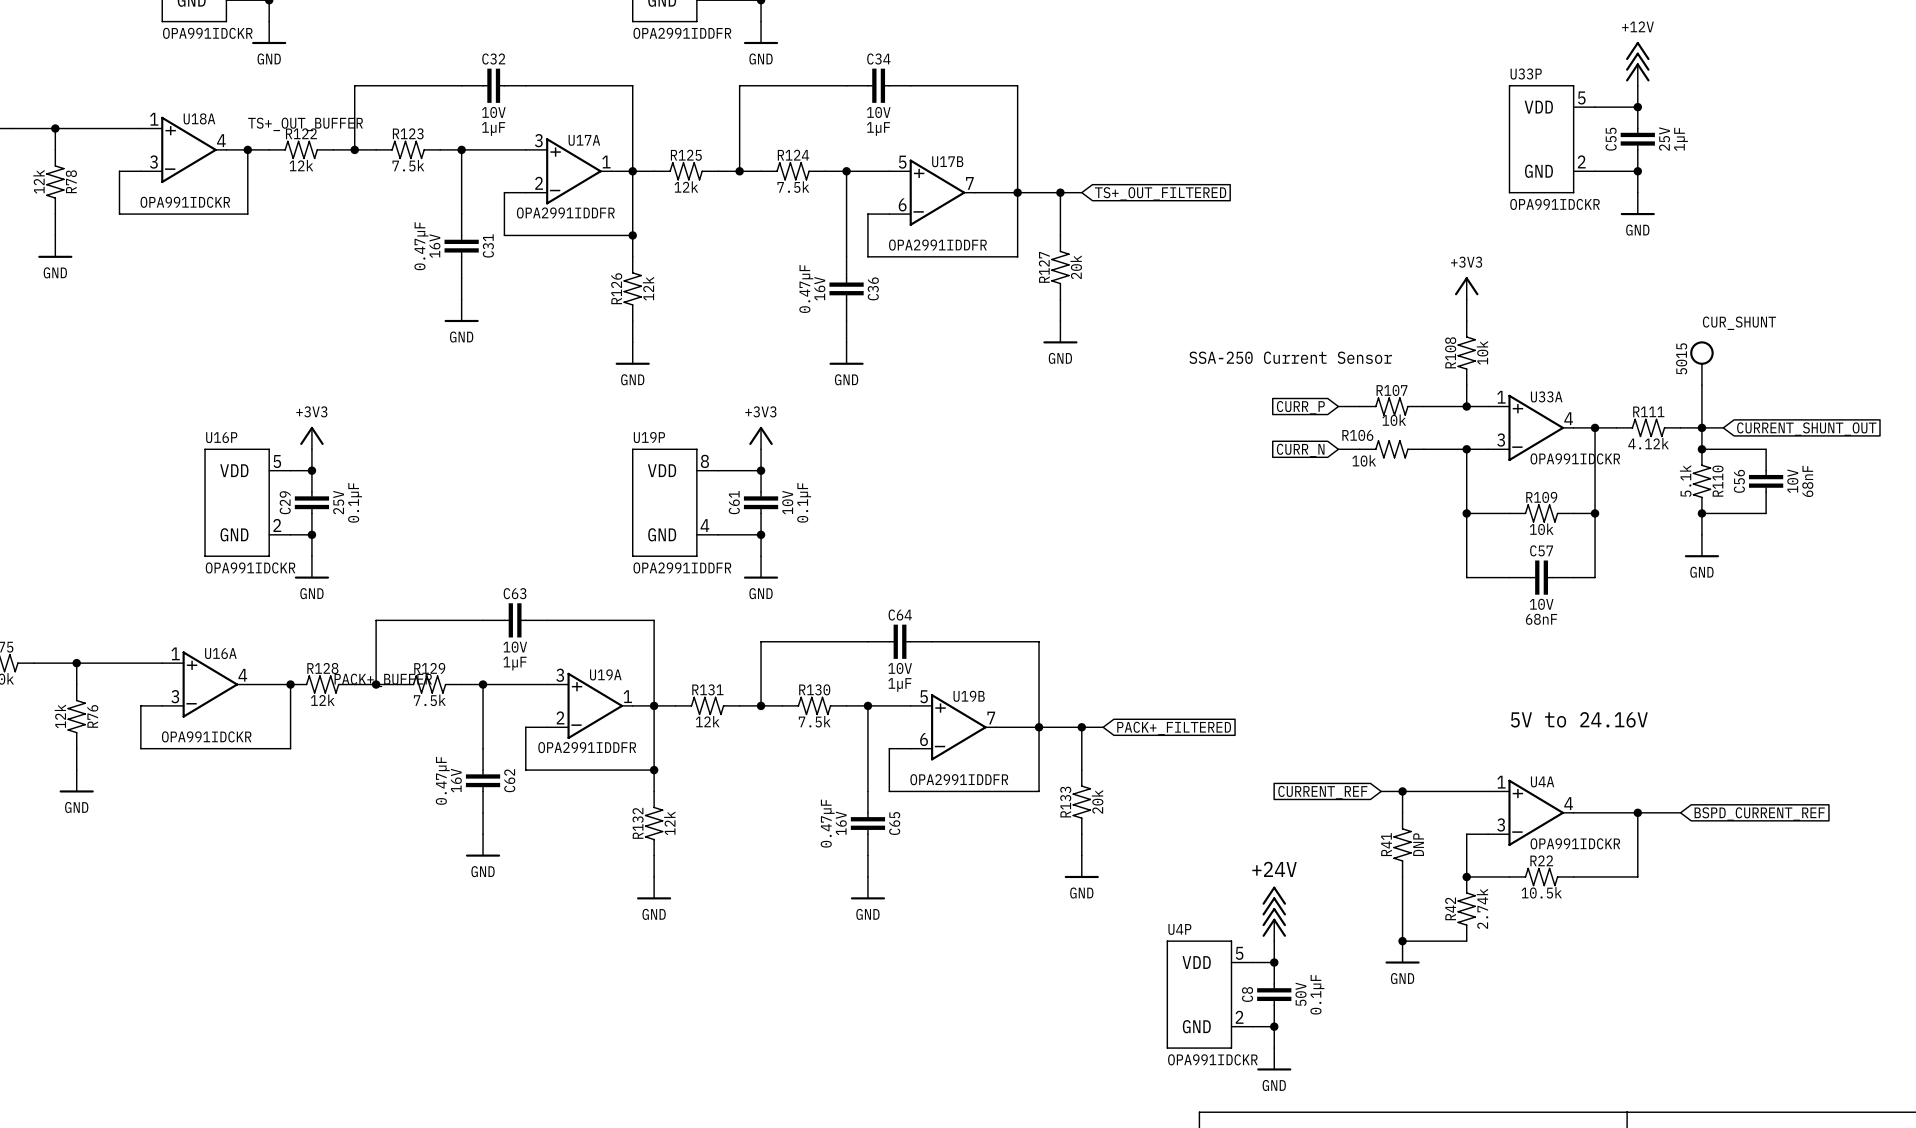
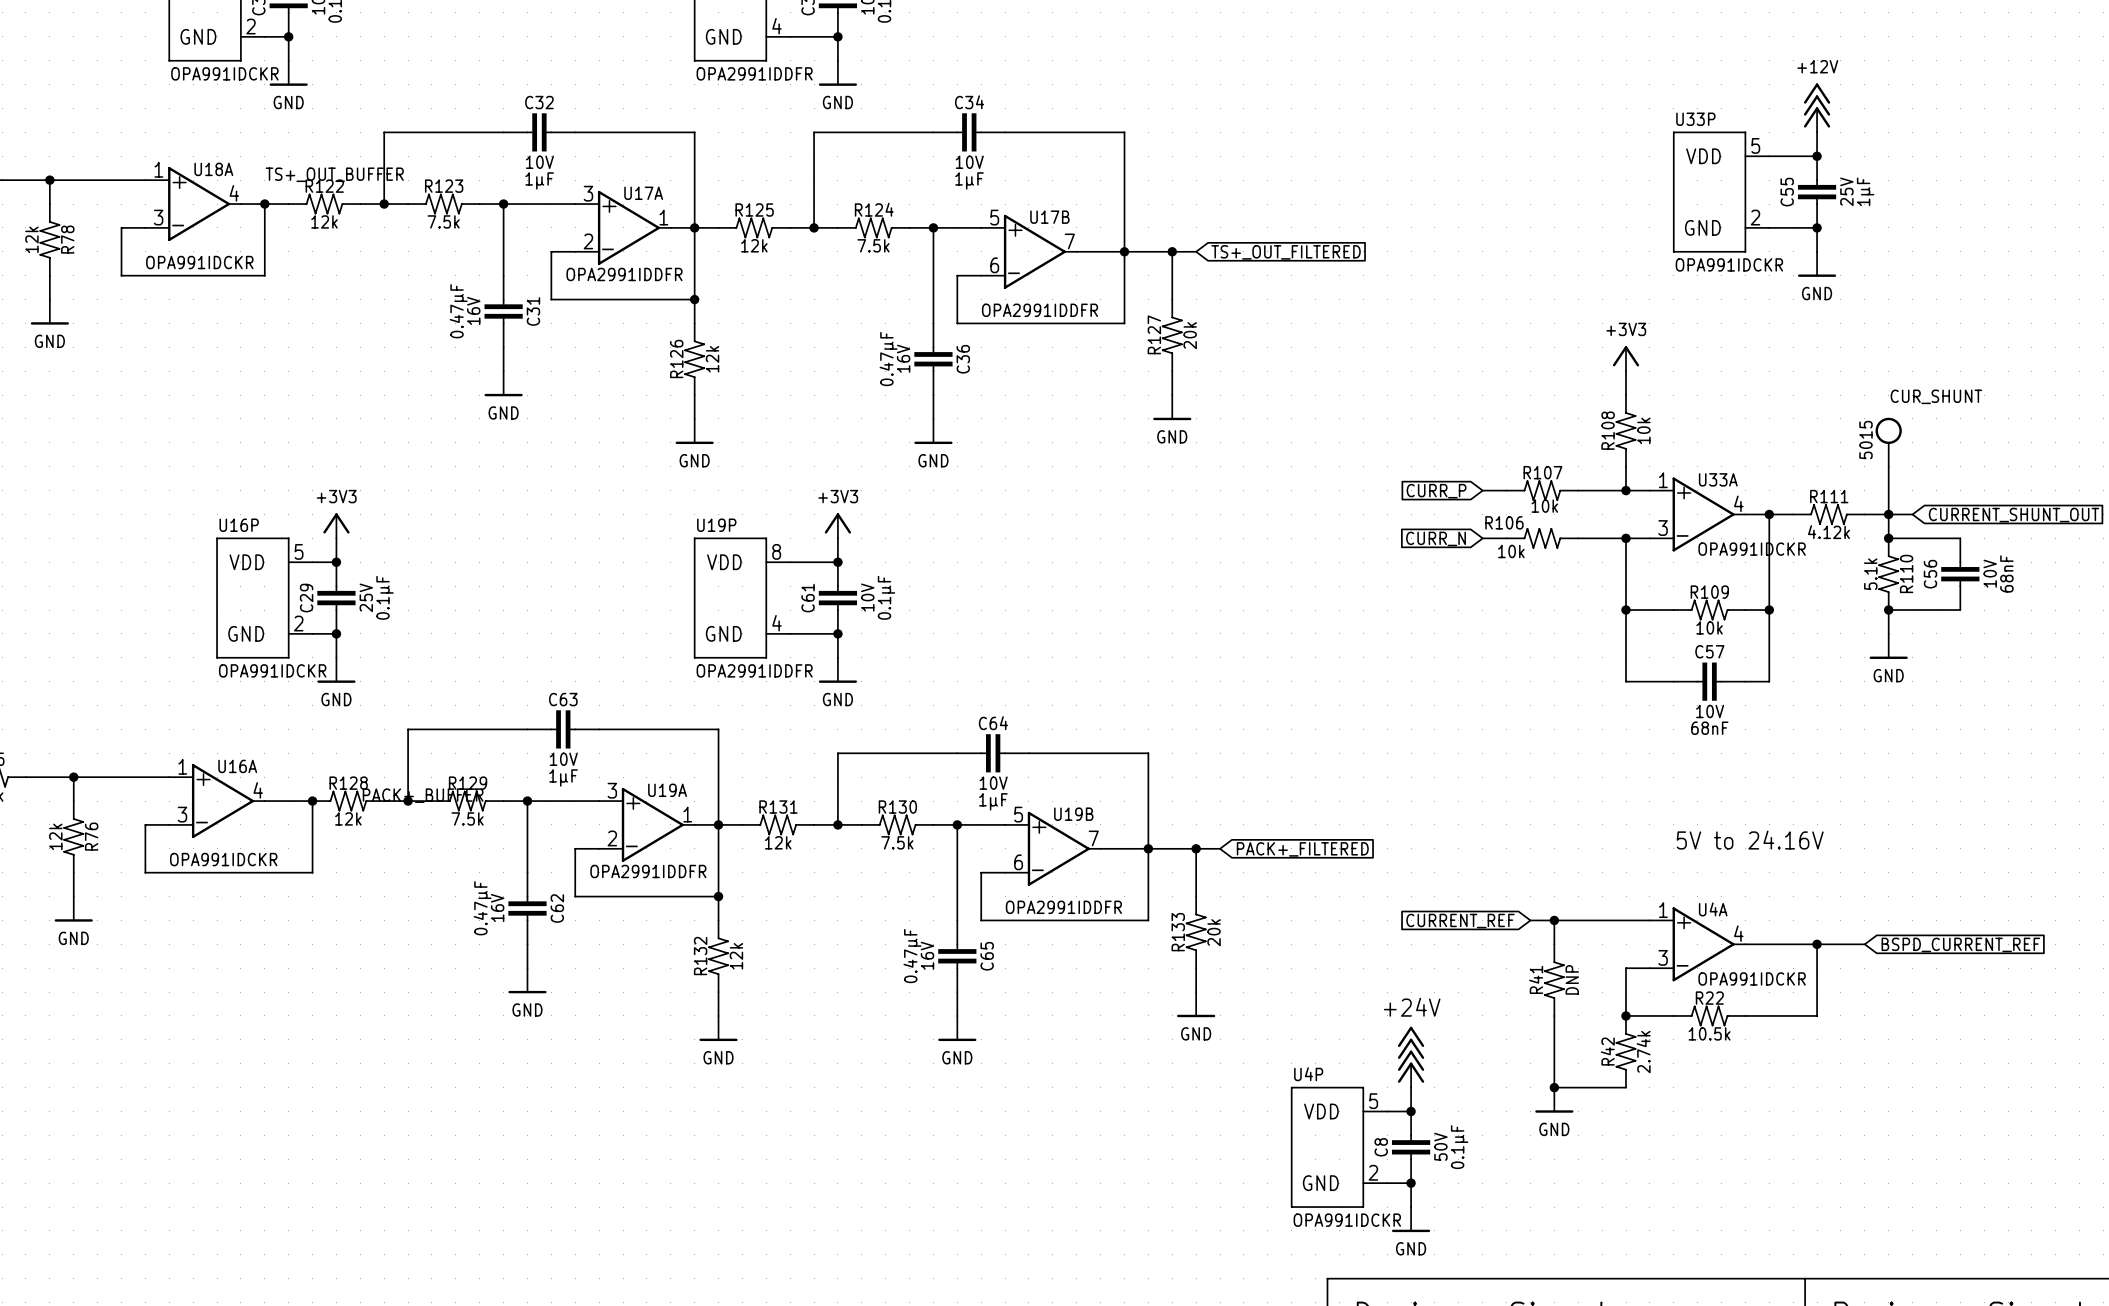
text: SSA-250 Current Sensor (1290, 357) -> none

